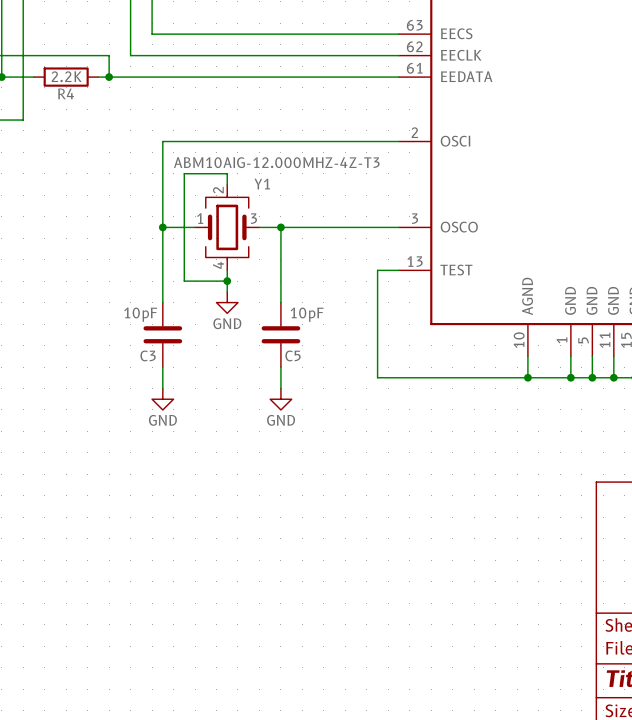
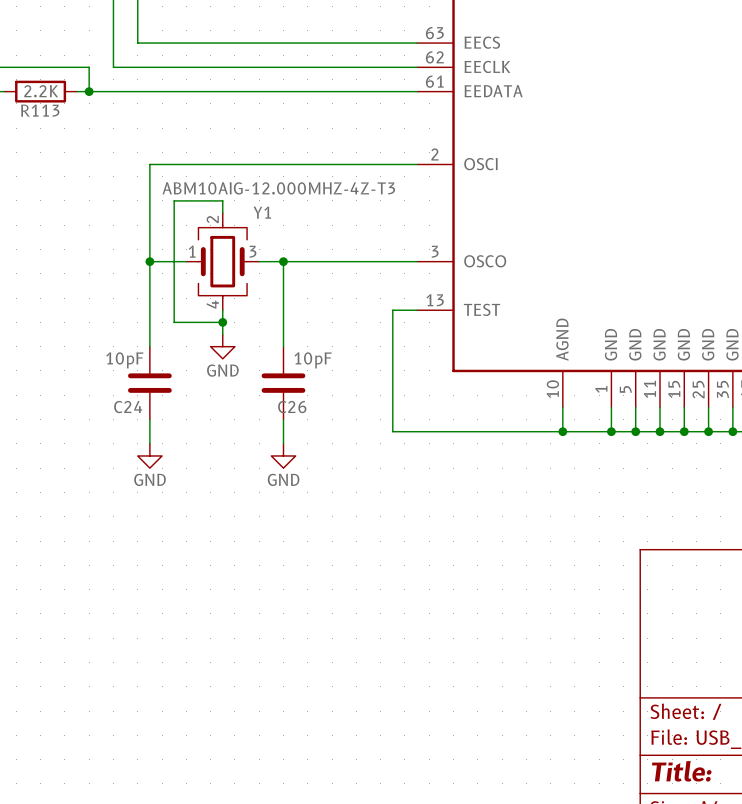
R4 name: R4 (66, 93) -> R113 (40, 110)
C3 name: C3 (148, 355) -> C24 (128, 407)
C5 name: C5 (293, 355) -> C26 (292, 407)

